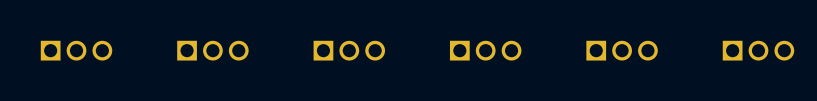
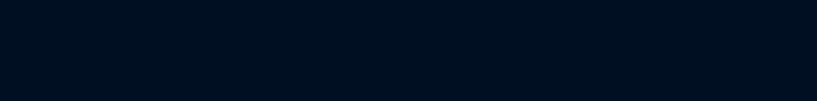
part: (76, 50) -> none
part: (212, 50) -> none
part: (349, 50) -> none
part: (485, 50) -> none
part: (622, 50) -> none
part: (758, 50) -> none

